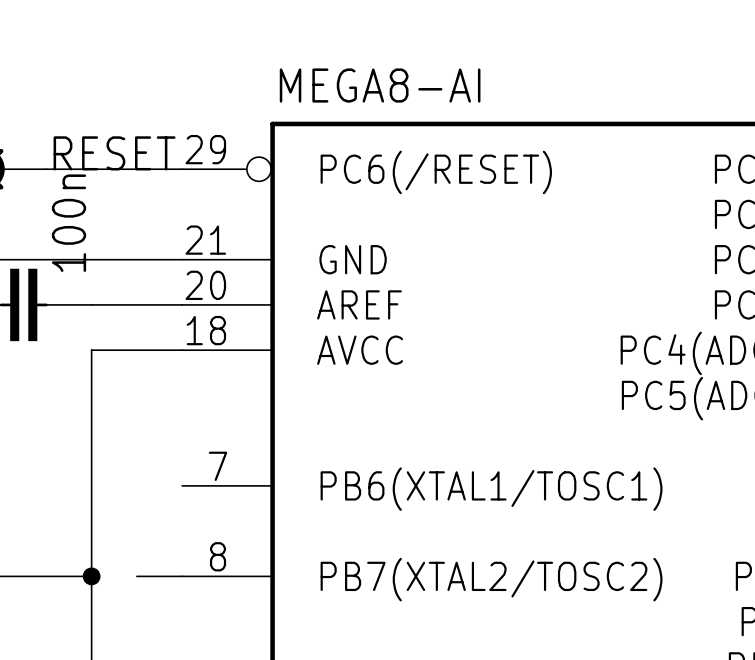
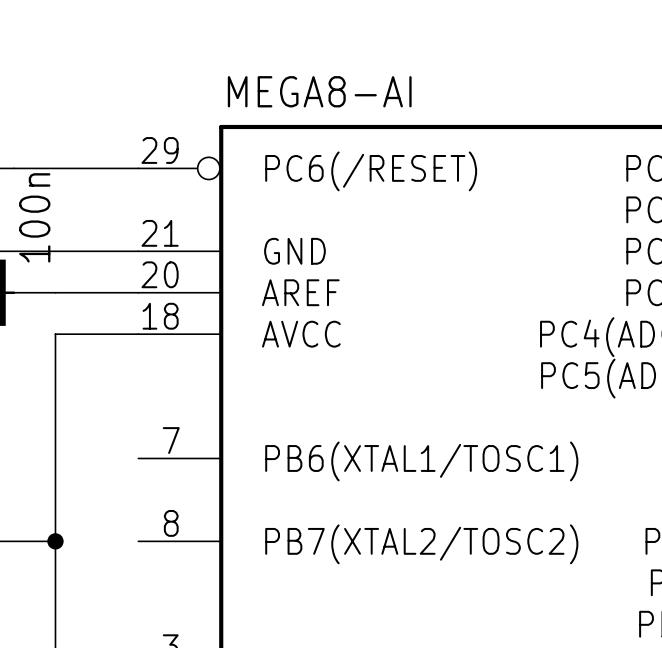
label: RESET (114, 153) -> none
wire: (136, 576) (182, 576) -> none

